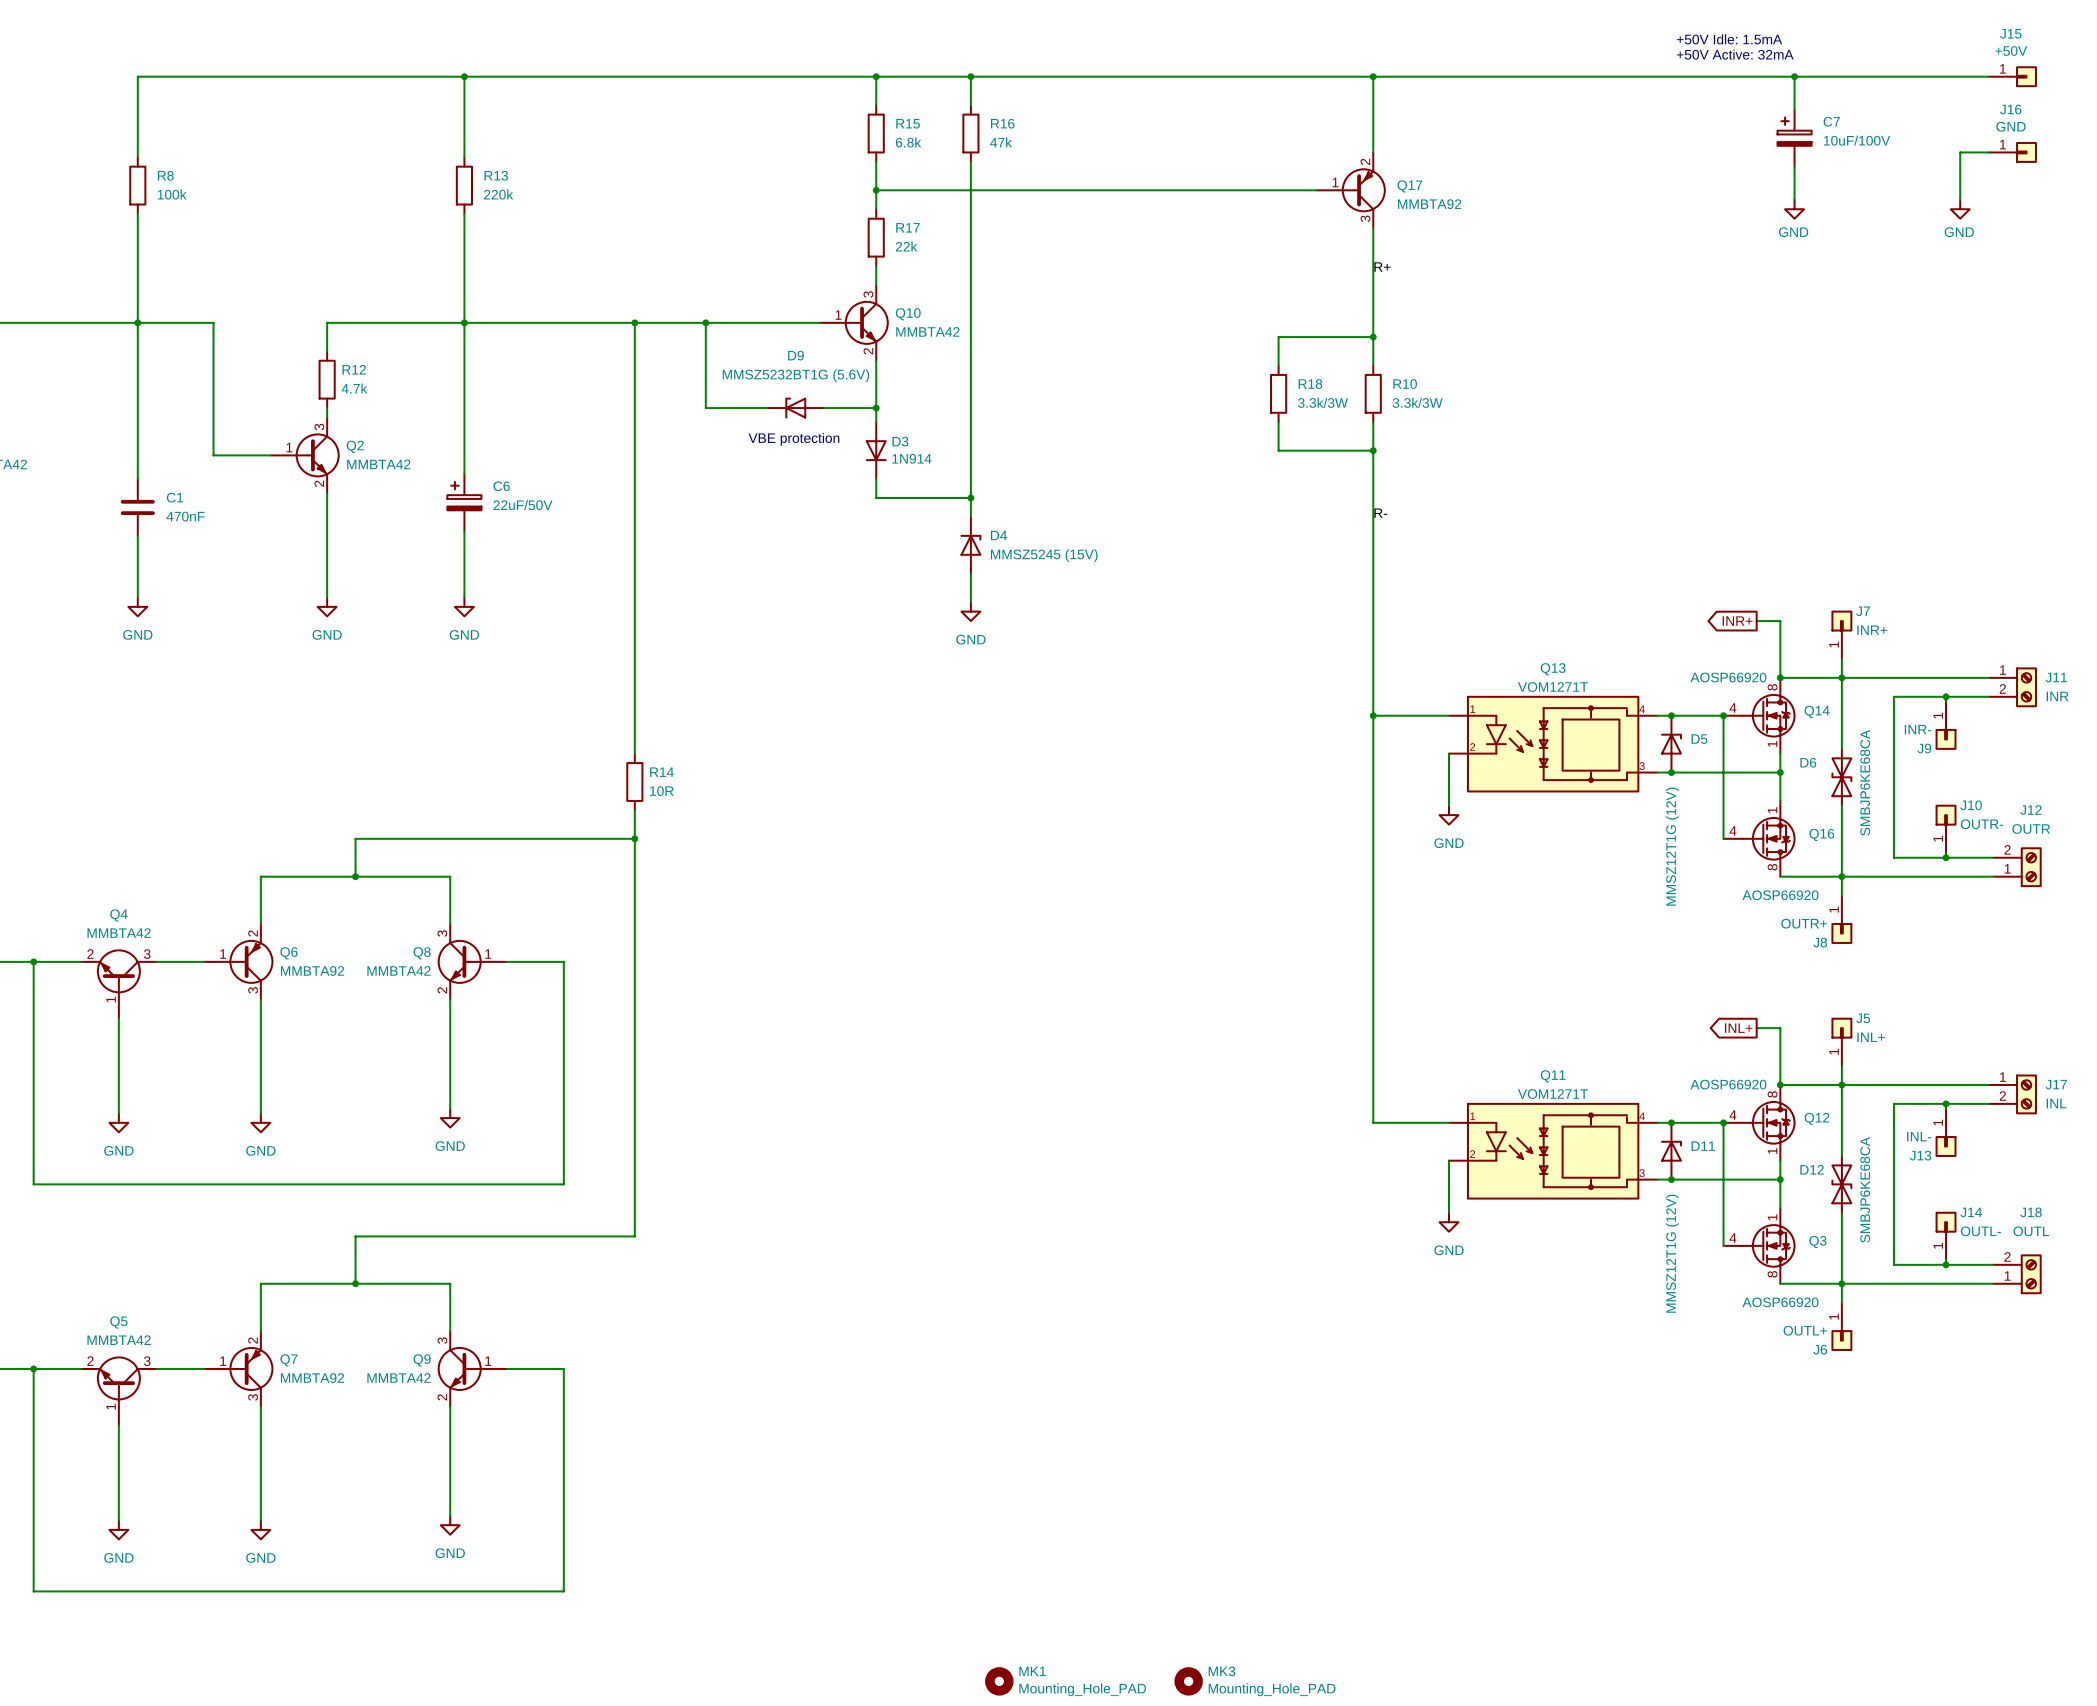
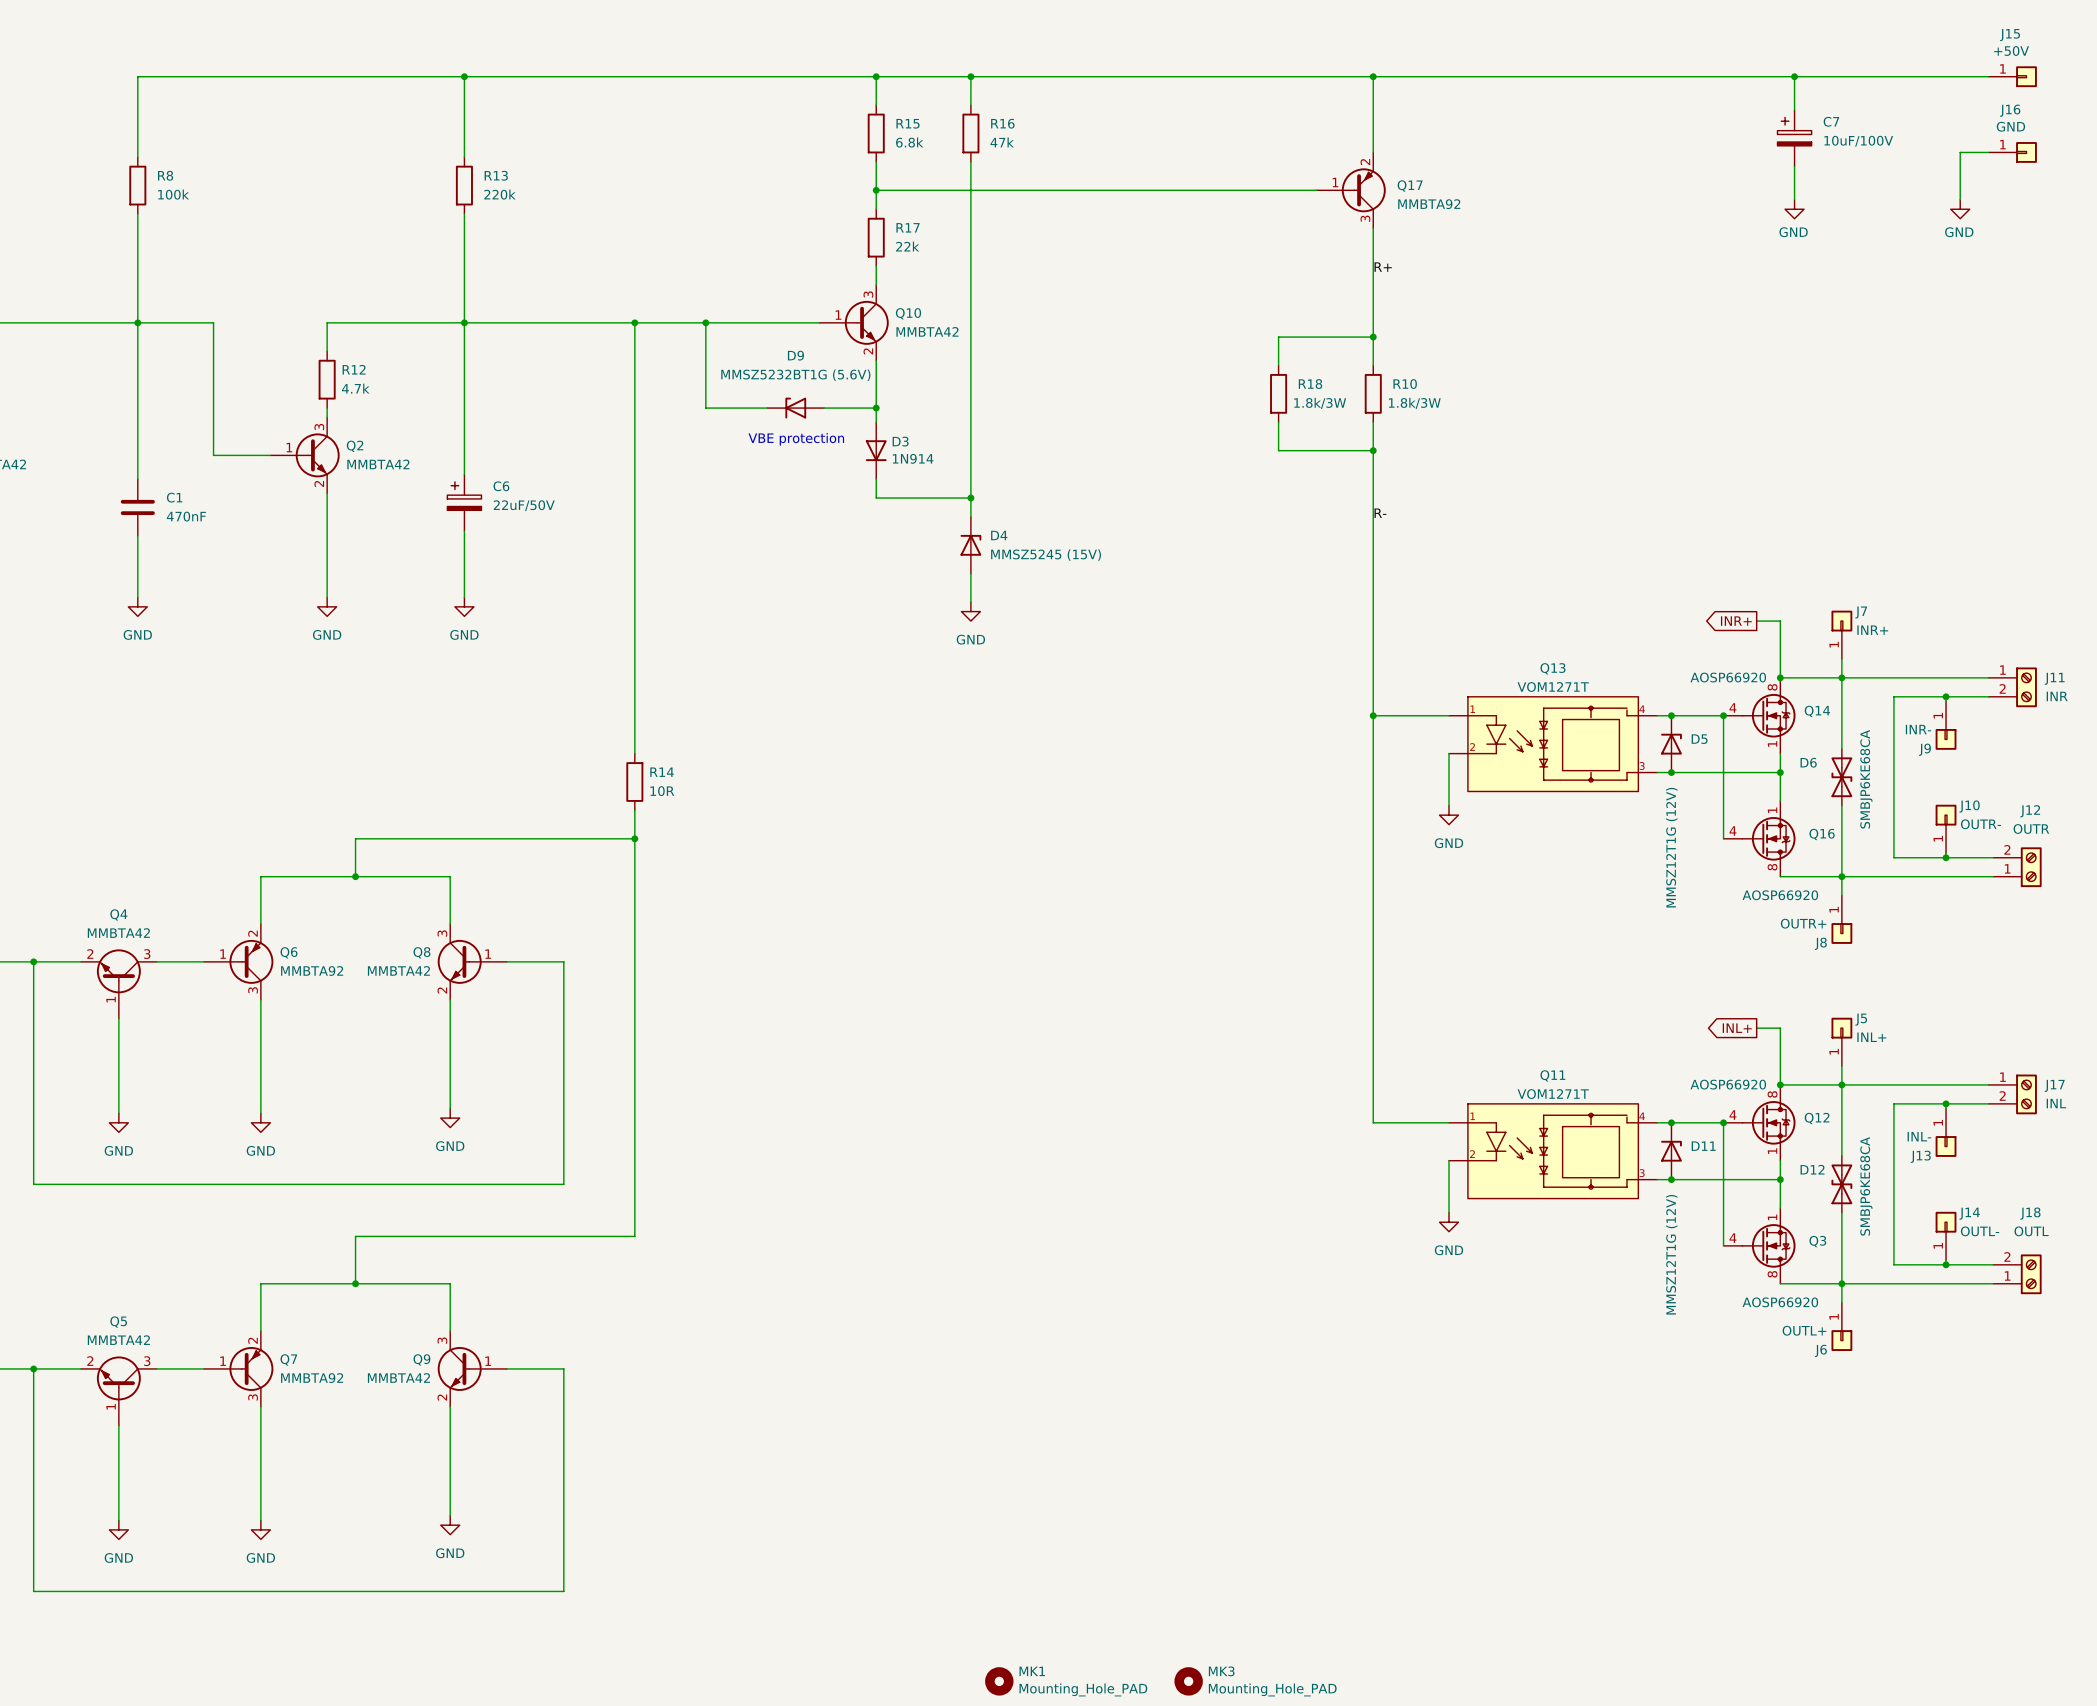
text: +50V Idle: 1.5mA (1729, 39) -> none
text: +50V Active: 32mA (1735, 54) -> none
R18 value: 3.3k/3W (1323, 402) -> 1.8k/3W (1320, 403)
R10 value: 3.3k/3W (1417, 402) -> 1.8k/3W (1414, 403)

